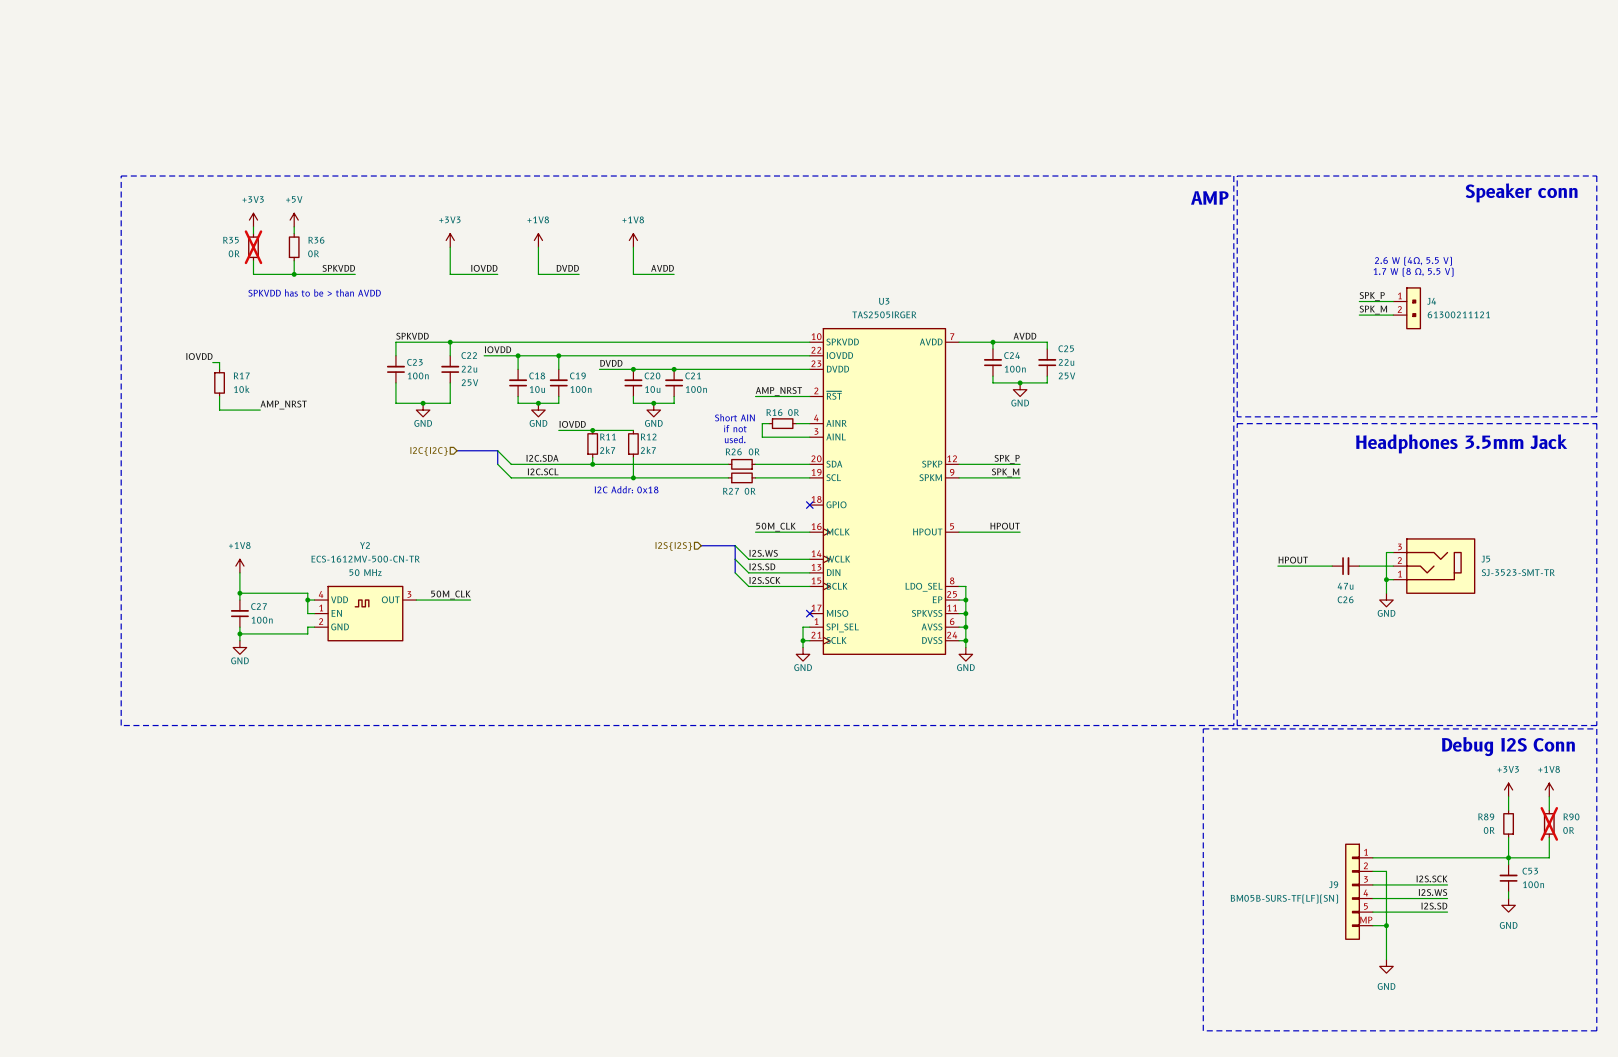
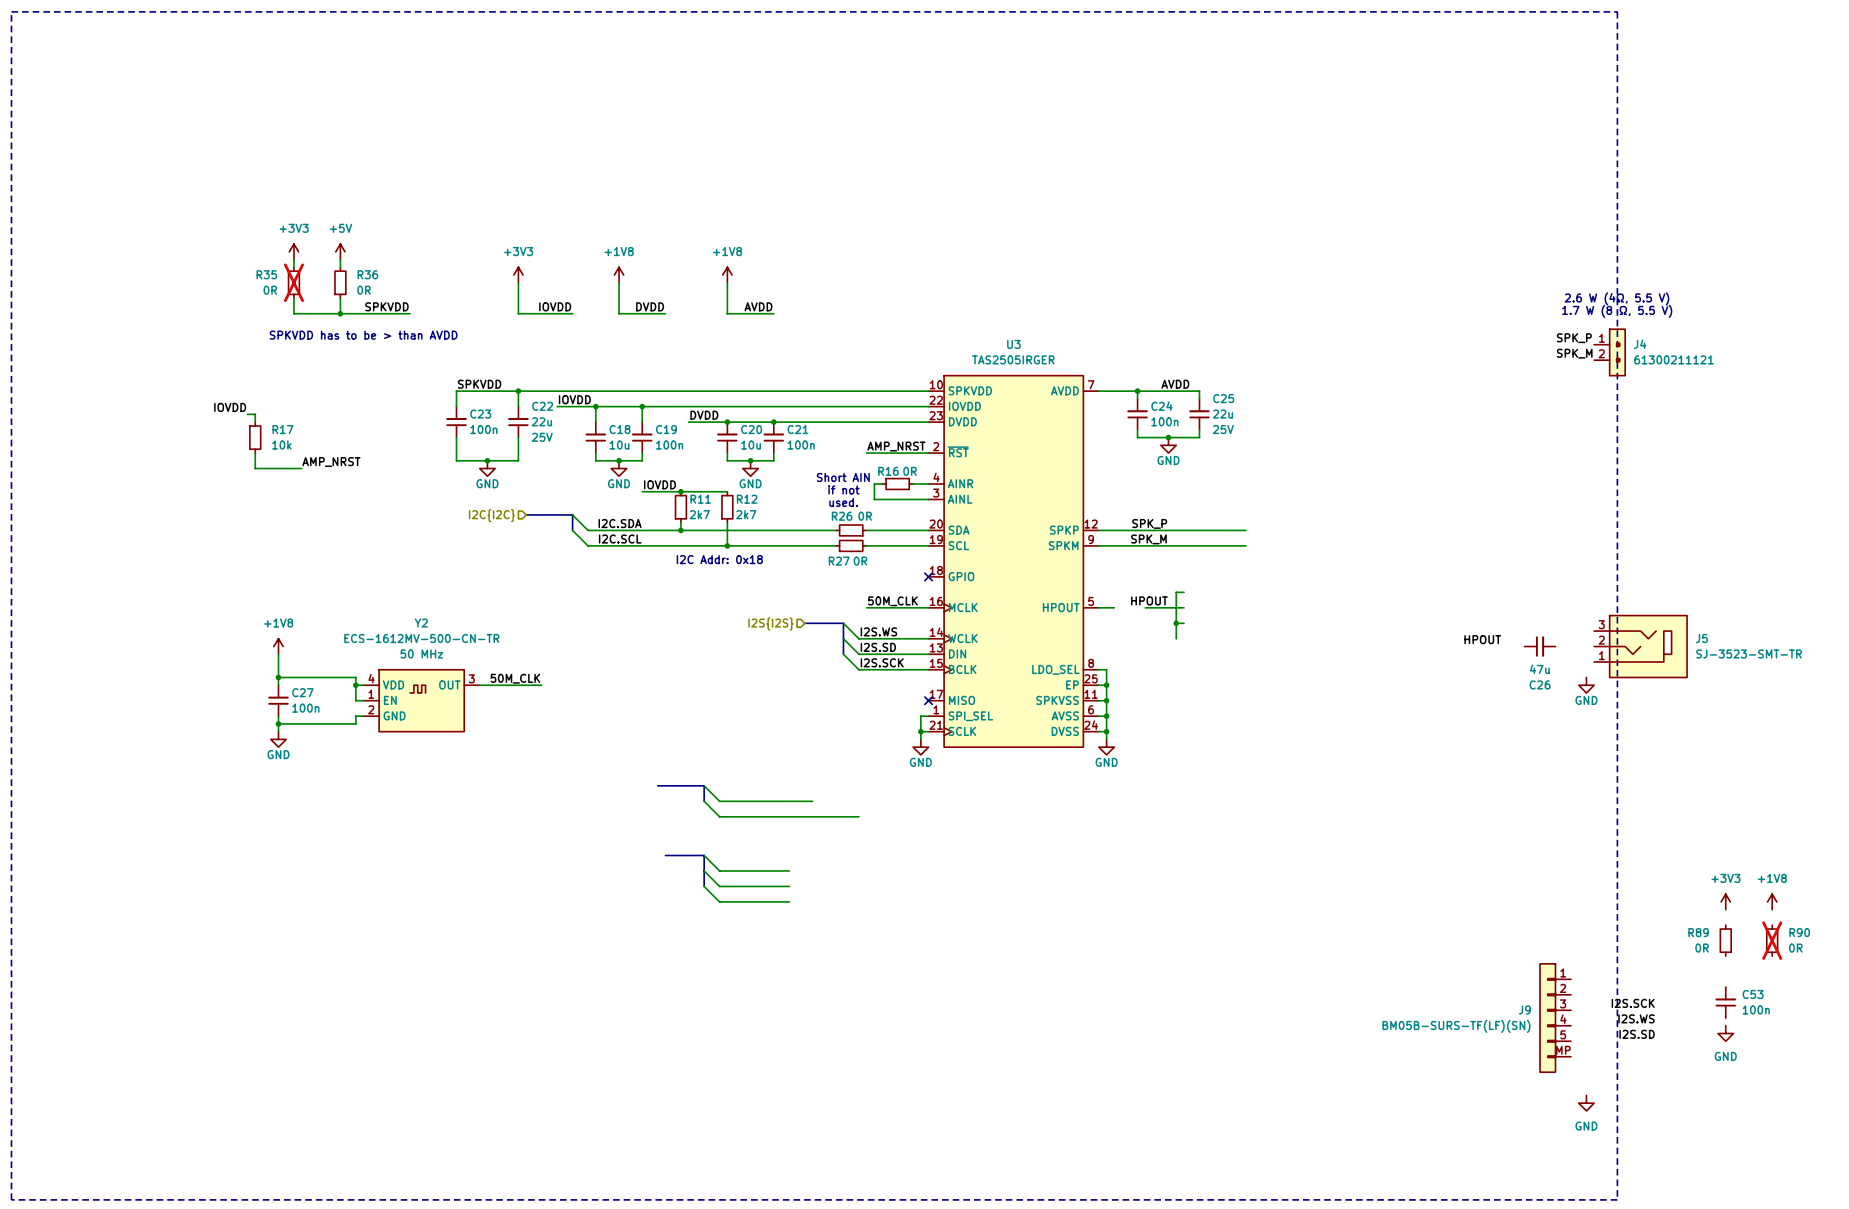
line: none -> (11, 11) (1617, 11) (1617, 1199) (11, 1199) (11, 11)
line: (121, 176) (1233, 176) (1233, 725) (121, 725) (121, 176) -> none
line: (1237, 176) (1237, 416) (1596, 416) (1596, 176) (1237, 176) -> none
text: Speaker conn (1521, 192) -> none
text: AMP (1209, 197) -> none
wire: (1359, 301) (1393, 301) -> none
wire: (1359, 315) (1393, 315) -> none
line: (1237, 423) (1596, 423) (1596, 725) (1237, 725) (1237, 423) -> none
text: Headphones 3.5mm Jack (1461, 443) -> none
wire: none -> (1168, 530) (1245, 530)
wire: none -> (1168, 545) (1245, 545)
wire: none -> (1184, 592) (1176, 592) (1176, 638)
wire: (972, 532) (999, 532) -> none
wire: none -> (1168, 607) (1184, 607)
wire: none -> (1176, 623) (1184, 623)
junction: none -> (1176, 623)
wire: (1393, 552) (1386, 552) (1386, 593) -> none
wire: (1277, 566) (1332, 566) -> none
wire: (1359, 566) (1393, 566) -> none
wire: (1386, 579) (1393, 579) -> none
junction: (1386, 579) -> none
bus: none -> (657, 785) (704, 785) (704, 801)
wire: none -> (704, 785) (719, 801) (812, 801)
wire: none -> (704, 801) (719, 816) (858, 816)
line: (1203, 728) (1596, 728) (1596, 1030) (1203, 1030) (1203, 728) -> none
text: Debug I2S Conn (1508, 746) -> none
bus: none -> (665, 855) (704, 855) (704, 886)
wire: none -> (704, 855) (719, 870) (789, 870)
wire: none -> (704, 870) (719, 886) (789, 886)
wire: none -> (704, 886) (719, 901) (789, 901)
wire: (1508, 796) (1508, 810) -> none
wire: (1549, 796) (1549, 810) -> none
wire: (1508, 837) (1508, 864) -> none
wire: (1549, 837) (1549, 857) (1372, 857) -> none
junction: (1508, 857) -> none
wire: (1372, 871) (1386, 871) (1386, 959) -> none
wire: (1372, 884) (1447, 884) -> none
wire: (1508, 891) (1508, 898) -> none
wire: (1372, 898) (1447, 898) -> none
wire: (1372, 912) (1447, 912) -> none
wire: (1372, 925) (1386, 925) -> none
junction: (1386, 925) -> none

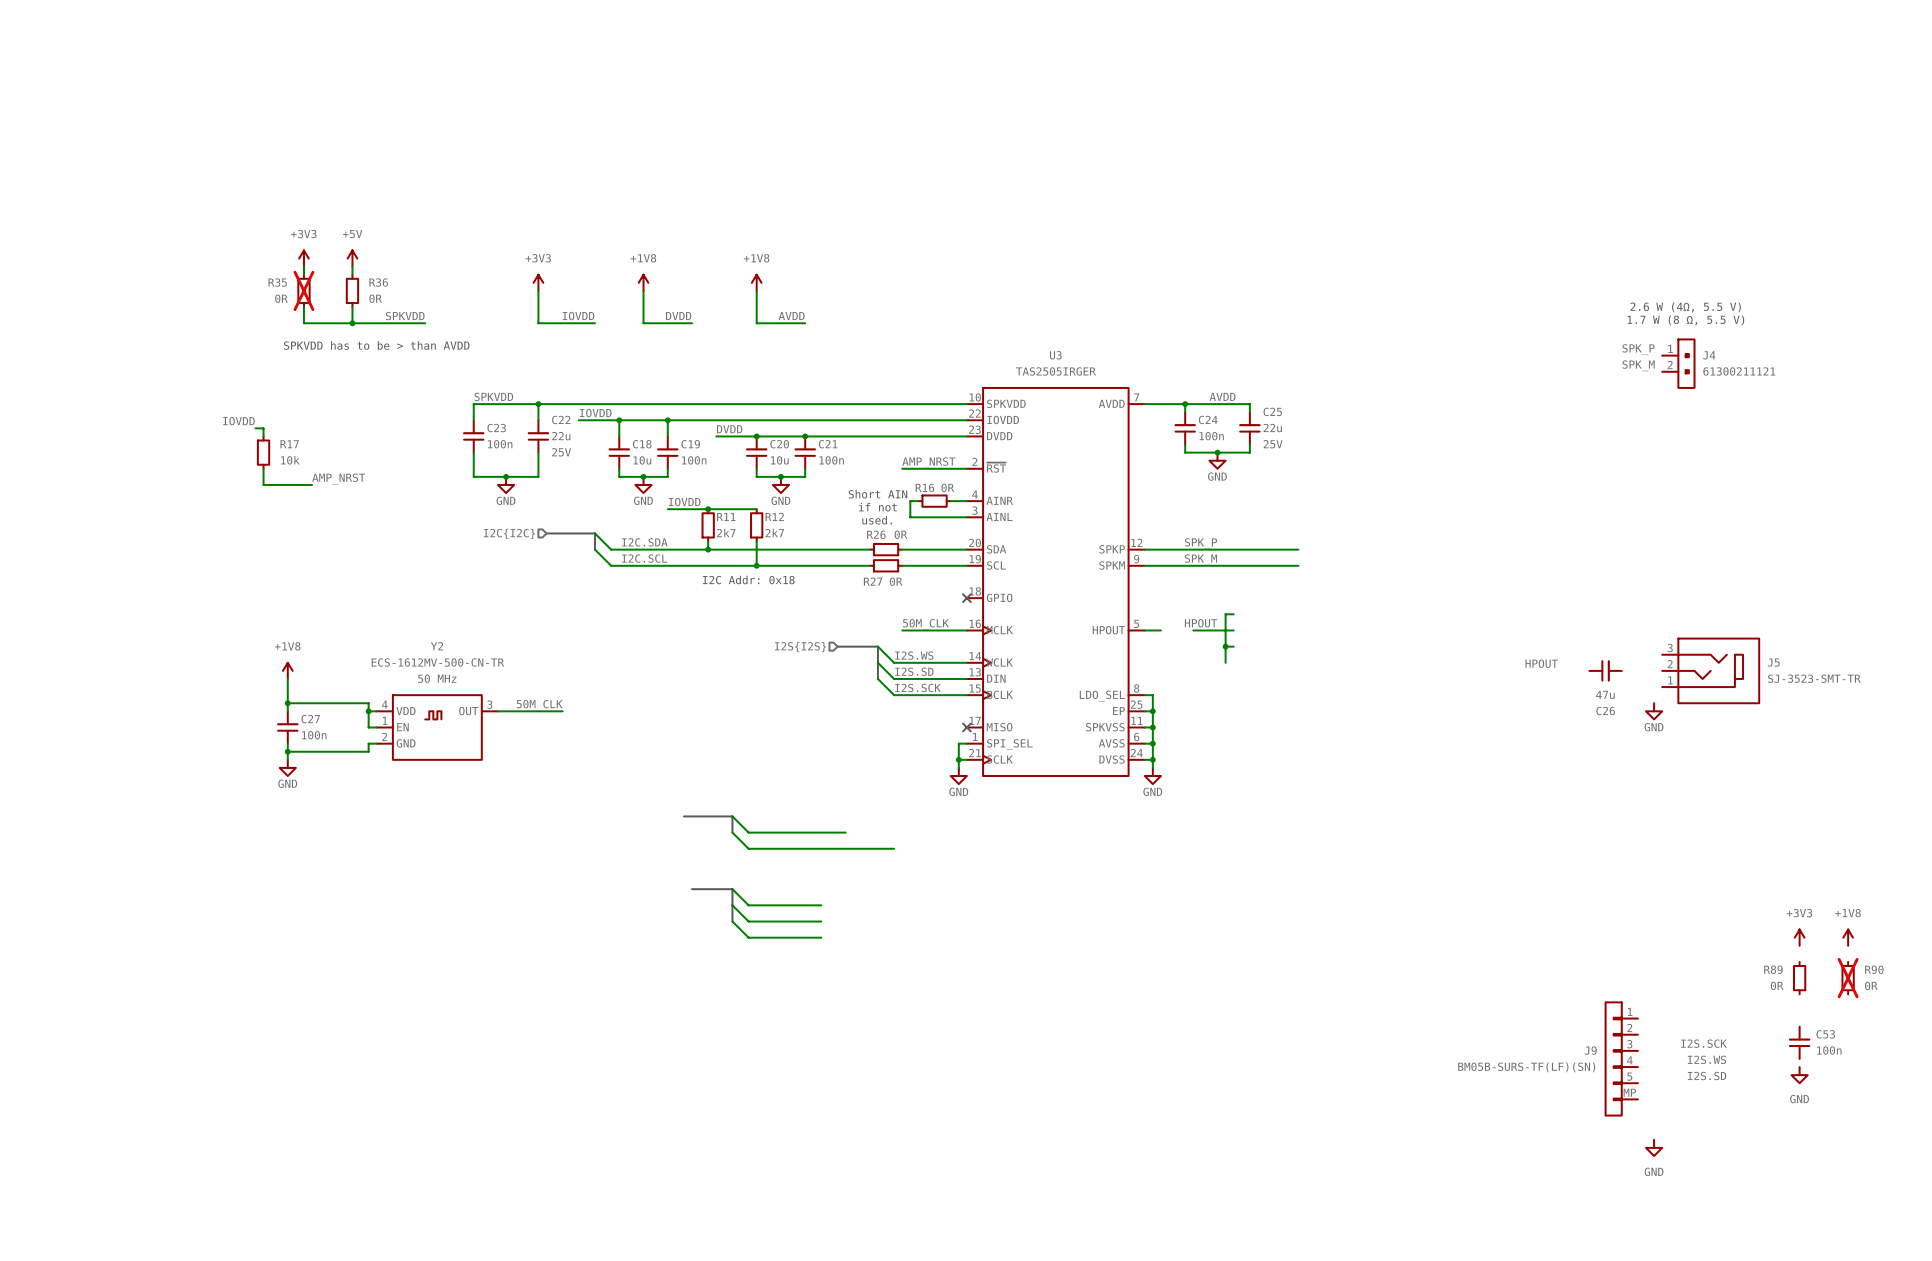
line: (11, 11) (1617, 11) (1617, 1199) (11, 1199) (11, 11) -> none

